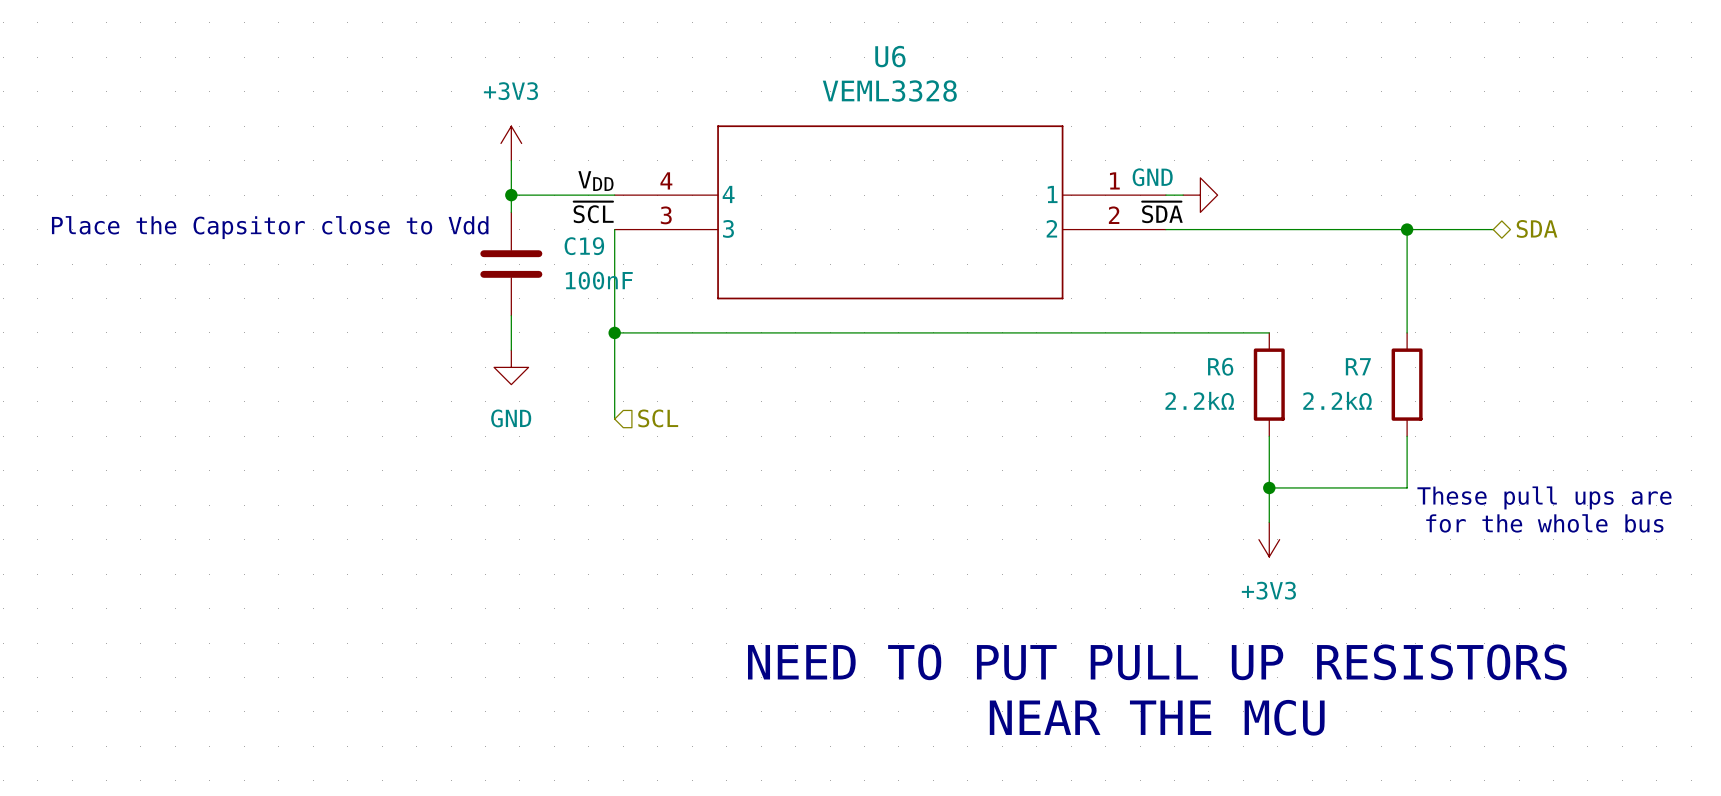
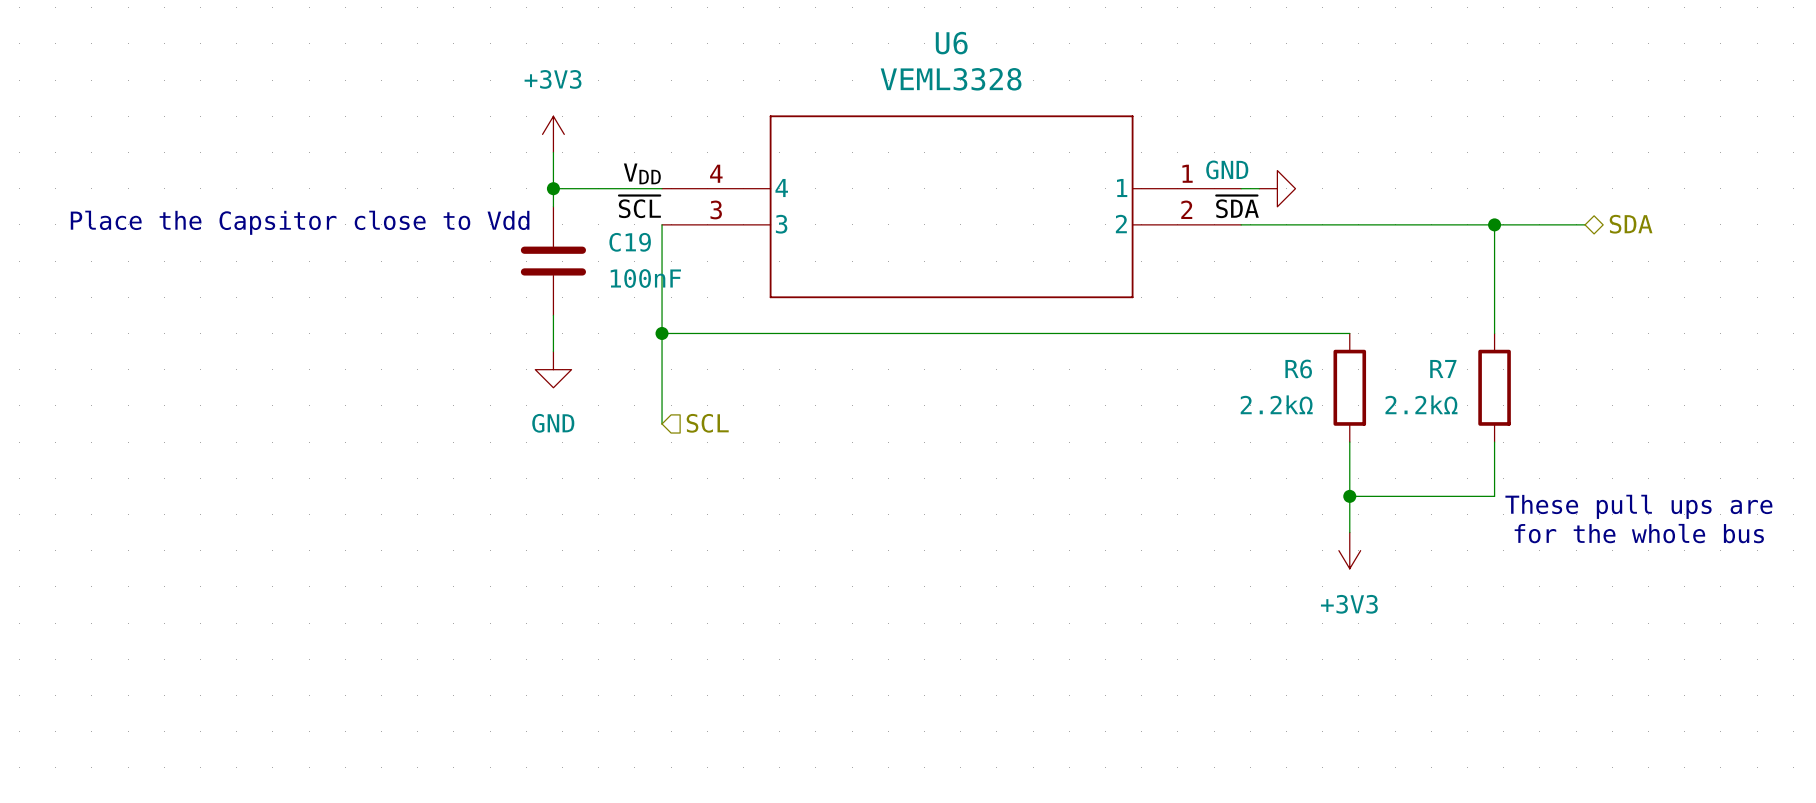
text: NEED TO PUT PULL UP RESISTORS (1157, 662) -> none
text: NEAR THE MCU (1157, 717) -> none

